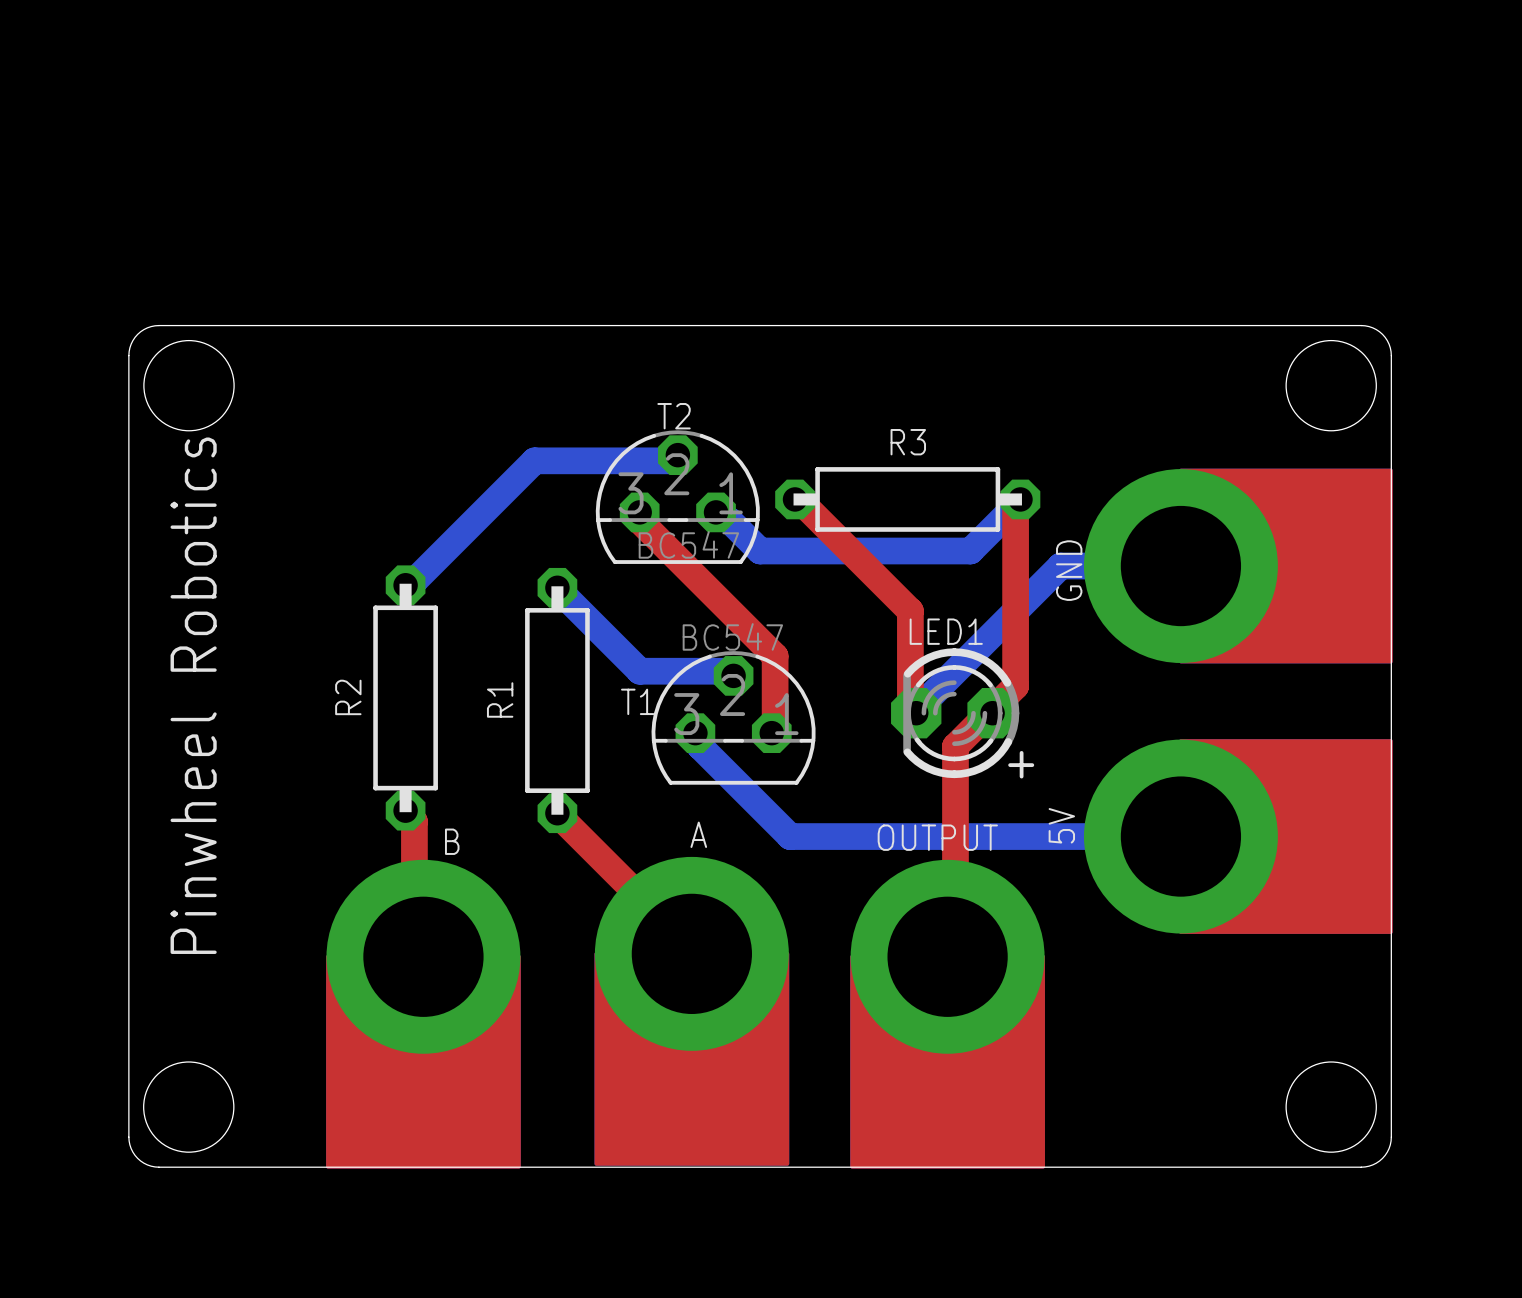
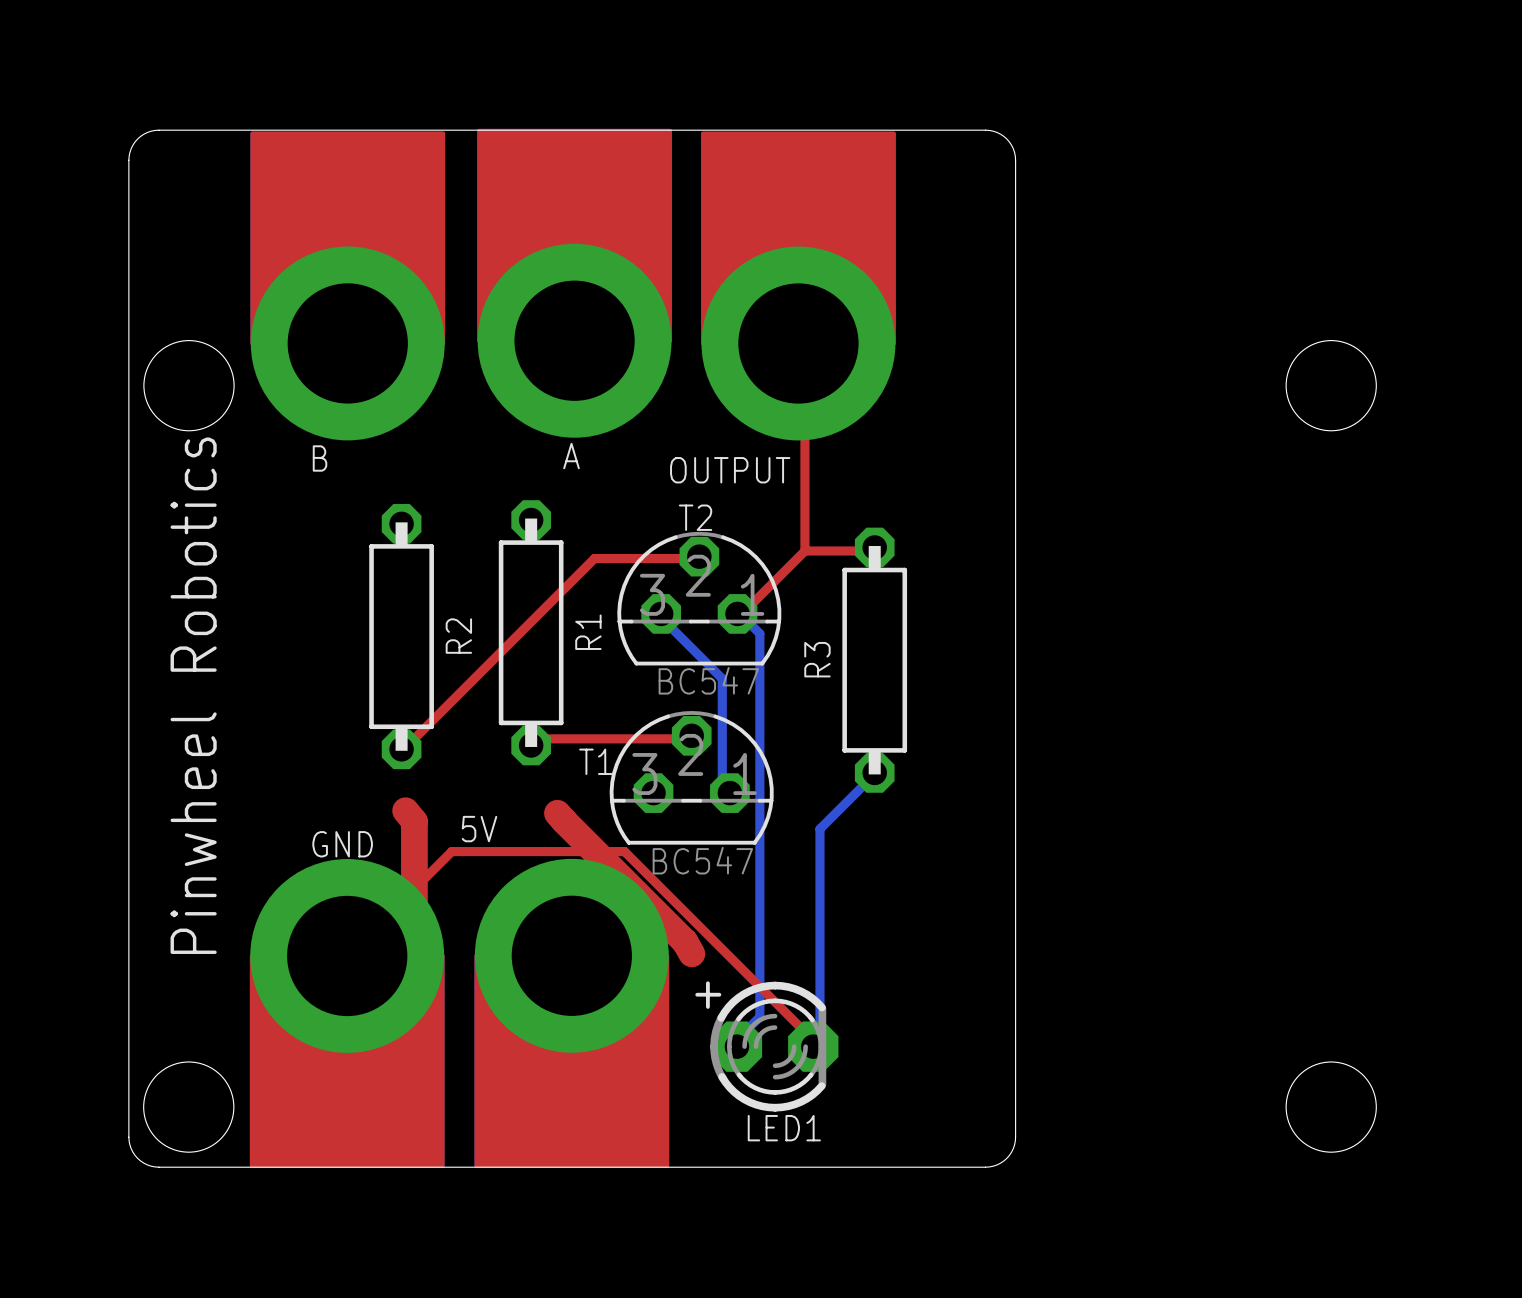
top track: none -> (798, 343) (804, 348) (804, 551)
board edge: (128, 355) (131, 344) (137, 334) (147, 327) (158, 325) (1361, 325) (1372, 327) (1382, 334) (1389, 344) (1391, 355) (1391, 1137) (1389, 1148) (1379, 1160) (1372, 1164) (1361, 1167) (985, 1167) -> (128, 355) (129, 156) (135, 141) (140, 136) (151, 131) (985, 130) (997, 132) (1006, 138) (1013, 148) (1015, 160) (1015, 1137) (1013, 1148) (1006, 1158) (997, 1164) (985, 1167)
T2 footprint: [595, 430, 760, 564] -> [617, 531, 782, 666]
bottom track: (677, 455) (669, 460) (534, 460) (414, 581) (405, 585) -> none
top track: (795, 499) (805, 505) (910, 611) (910, 701) (916, 713) -> none
R3 rotation: 0° (907, 499) -> 90° counterclockwise (874, 660)
R3 position: (907, 499) -> (874, 660)
bottom track: (1020, 499) (970, 551) (760, 551) (730, 520) (716, 512) -> none
top track: (1020, 499) (1015, 505) (1015, 686) (1000, 701) (992, 713) (985, 716) (955, 746) (955, 956) (947, 956) -> none
top track: (639, 512) (639, 520) (775, 656) (775, 731) (771, 733) -> none
top track: none -> (874, 547) (872, 551) (804, 551)
top track: none -> (804, 551) (744, 611) (737, 613)
top track: none -> (699, 556) (692, 558) (594, 558) (401, 749)
bottom track: (1180, 566) (1060, 566) (925, 701) (916, 713) -> none
GND: (1238, 566) -> none
bottom track: (557, 587) (639, 671) (730, 671) (733, 675) -> none
bottom track: none -> (661, 613) (662, 618) (722, 678) (722, 783) (729, 793)
bottom track: none -> (737, 613) (759, 633) (759, 1016) (737, 1039) (736, 1046)
T1 value position: BC547 (732, 636) -> BC547 (702, 860)
T1 footprint: [651, 651, 816, 785] -> [609, 711, 774, 845]
R2 rotation: 0° (405, 697) -> 180° (401, 636)
R1 rotation: 0° (557, 700) -> 180° (531, 632)
LED1 rotation: 0° (962, 713) -> 180° (766, 1046)
LED1 position: (962, 713) -> (766, 1046)
bottom track: (695, 733) (699, 746) (790, 836) (1180, 836) -> none
top track: none -> (691, 735) (684, 738) (534, 738) (531, 745)
bottom track: none -> (874, 772) (819, 829) (819, 1039) (813, 1046)
5V name position: 5V (1061, 825) -> 5V (479, 829)
5V rotation: 0° (1238, 836) -> 90° clockwise (571, 1013)
5V position: (1238, 836) -> (571, 1013)
OUTPUT name position: OUTPUT (937, 837) -> OUTPUT (730, 470)
top track: none -> (347, 955) (451, 851) (624, 851) (812, 1039) (813, 1046)
A rotation: 0° (691, 1011) -> 180° (574, 283)
A position: (691, 1011) -> (574, 283)
GND: none -> (347, 1013)
B rotation: 0° (423, 1014) -> 180° (347, 285)
B position: (423, 1014) -> (347, 285)
OUTPUT rotation: 0° (947, 1014) -> 180° (798, 286)
OUTPUT position: (947, 1014) -> (798, 286)

